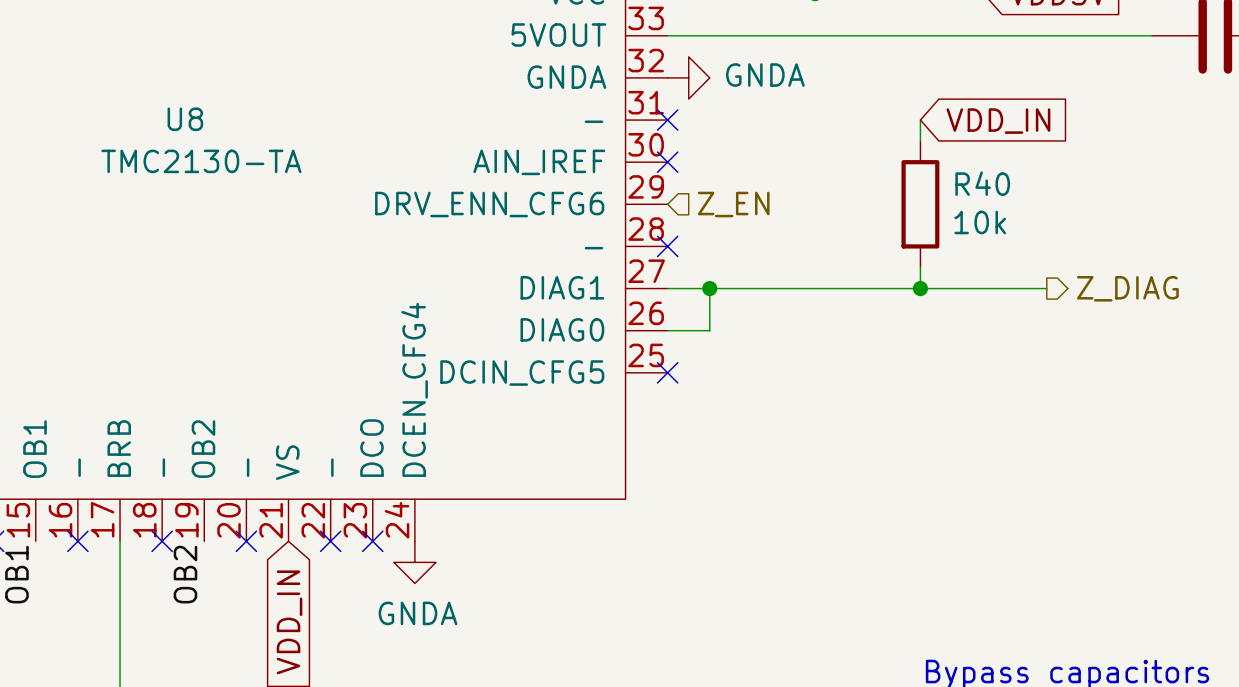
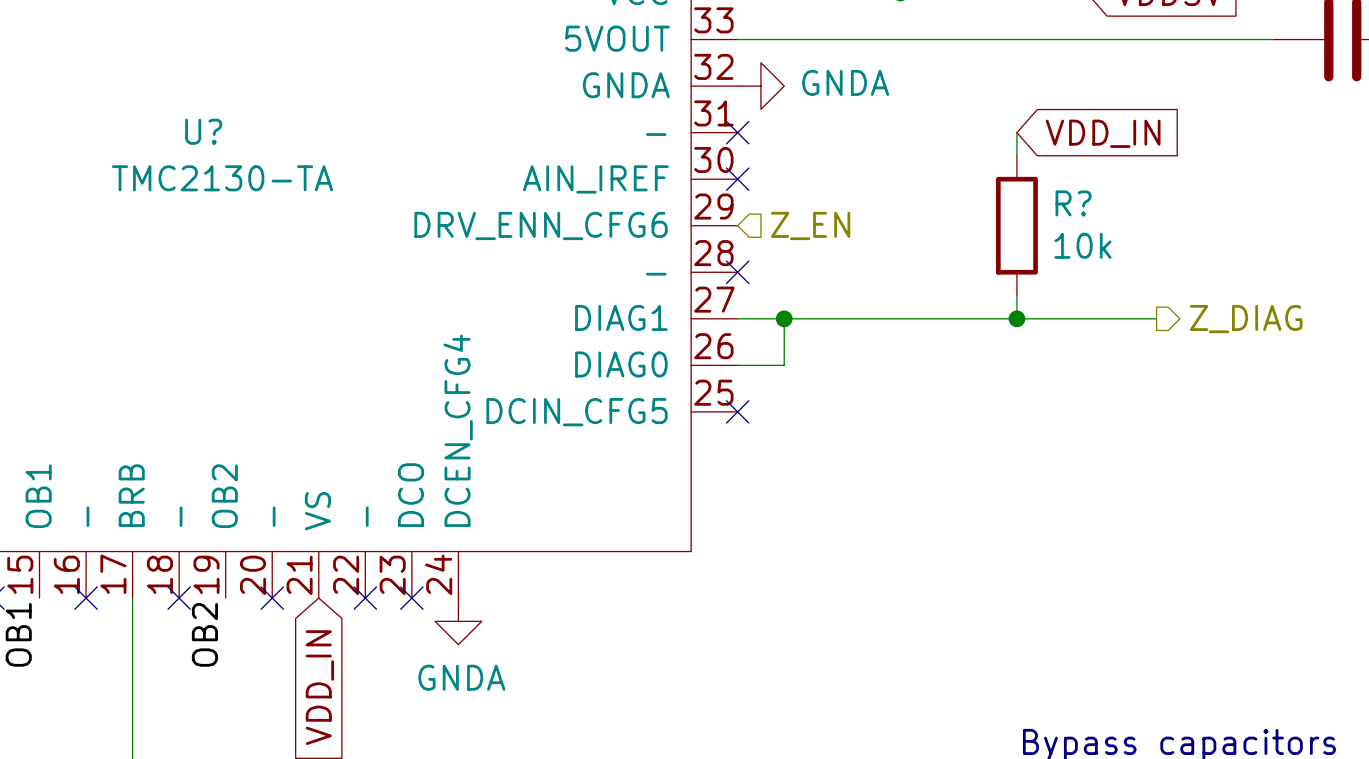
U8 name: U8 (185, 119) -> U? (203, 131)
R40 name: R40 (982, 183) -> R? (1073, 203)

